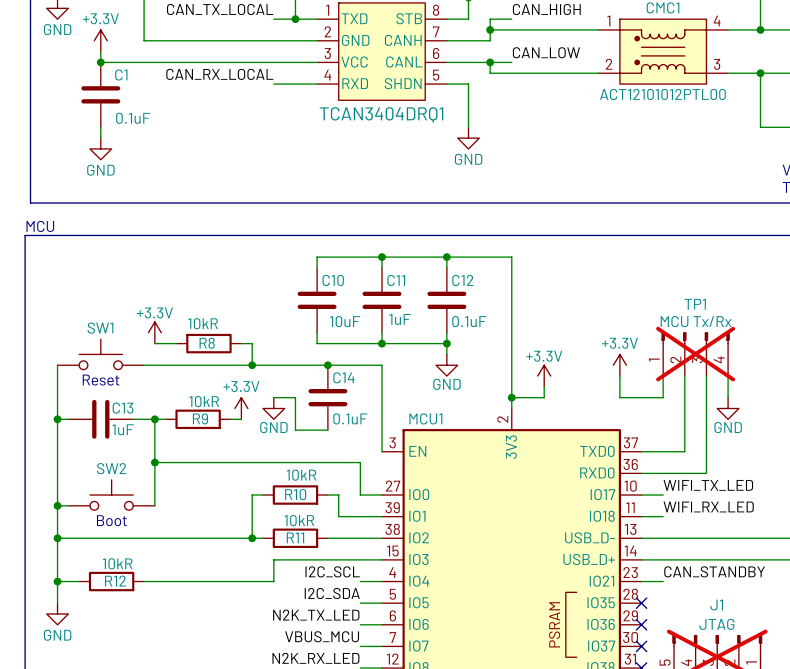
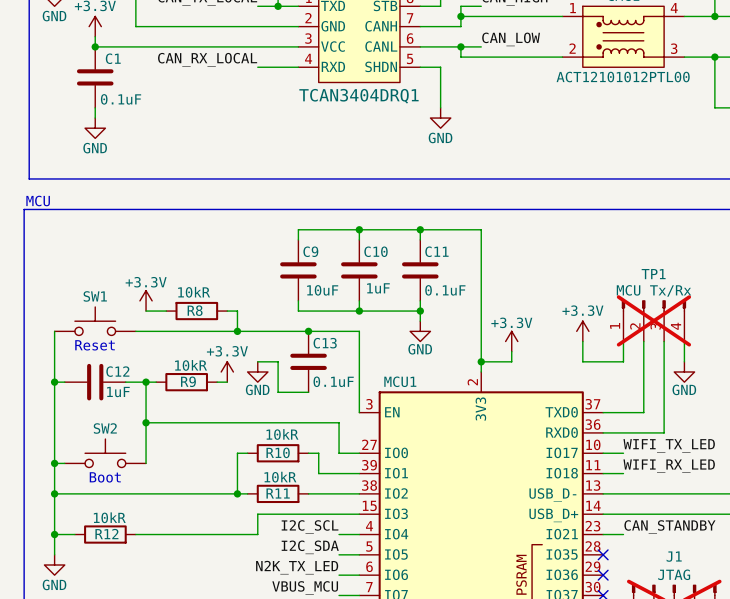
C10 name: C10 (333, 280) -> C9 (310, 251)
C11 name: C11 (396, 280) -> C10 (376, 251)
C12 name: C12 (462, 280) -> C11 (436, 251)
C14 name: C14 (343, 377) -> C13 (325, 343)
C13 name: C13 (123, 408) -> C12 (117, 371)

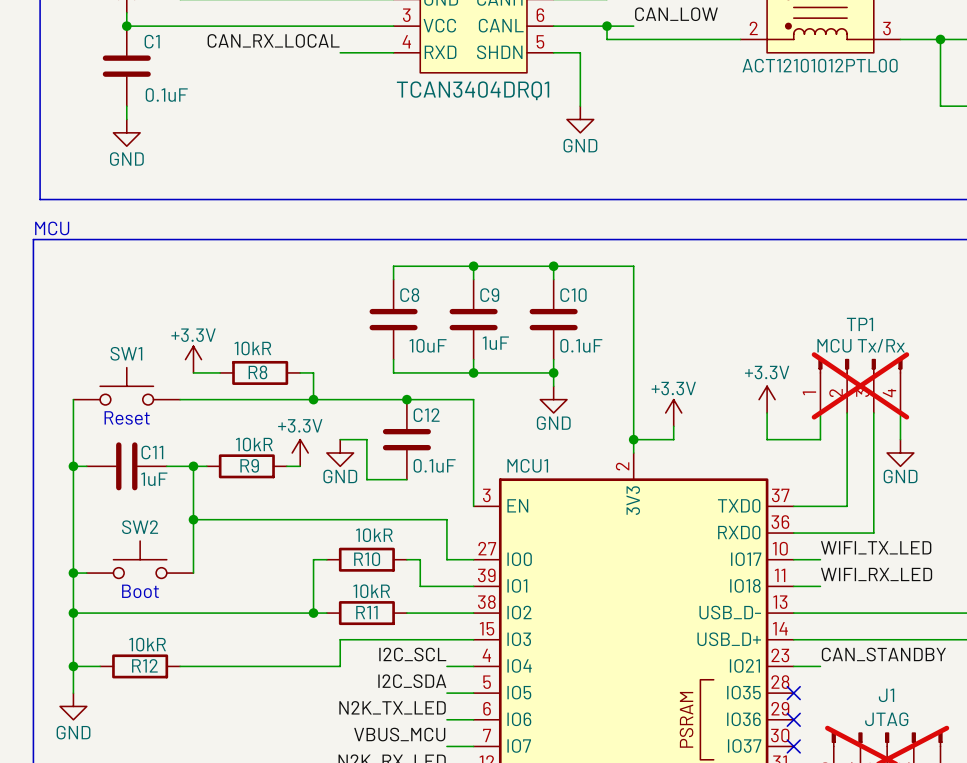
C9 name: C9 (310, 251) -> C8 (409, 295)
C10 name: C10 (376, 251) -> C9 (489, 295)
C11 name: C11 (436, 251) -> C10 (573, 295)
C13 name: C13 (325, 343) -> C12 (426, 415)
C12 name: C12 (117, 371) -> C11 (152, 452)

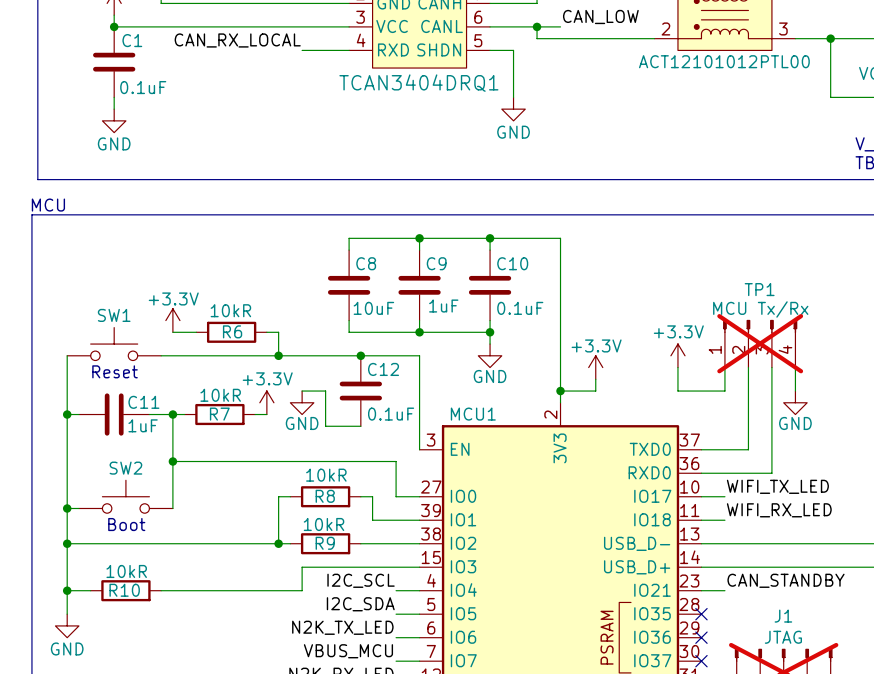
R8 name: R8 (257, 372) -> R6 (232, 331)
R9 name: R9 (249, 465) -> R7 (219, 414)
R10 name: R10 (367, 559) -> R8 (325, 496)
R11 name: R11 (366, 612) -> R9 (325, 543)
R12 name: R12 (144, 665) -> R10 (124, 590)

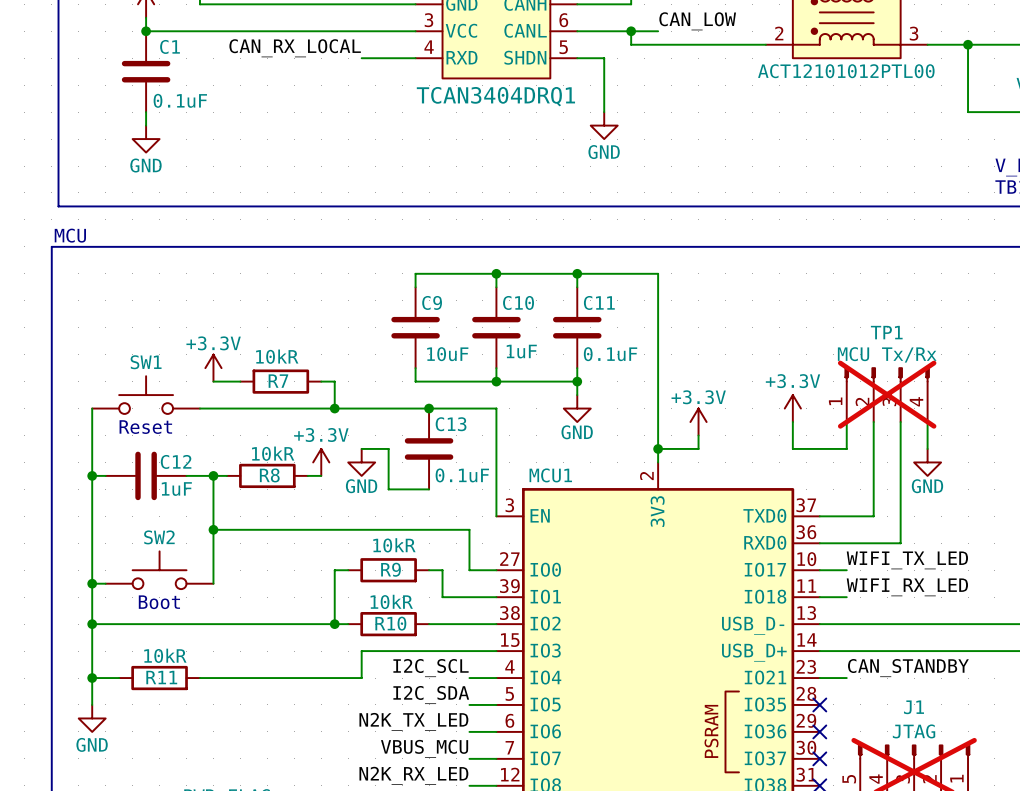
C8 name: C8 (366, 263) -> C9 (432, 302)
C9 name: C9 (436, 263) -> C10 (518, 302)
C10 name: C10 (512, 263) -> C11 (599, 302)
R6 name: R6 (232, 331) -> R7 (278, 381)
C12 name: C12 (383, 369) -> C13 (451, 424)
C11 name: C11 (143, 402) -> C12 (176, 461)
R7 name: R7 (219, 414) -> R8 (269, 475)
R8 name: R8 (325, 496) -> R9 (390, 569)
R9 name: R9 (325, 543) -> R10 (390, 623)
R10 name: R10 (124, 590) -> R11 (161, 677)

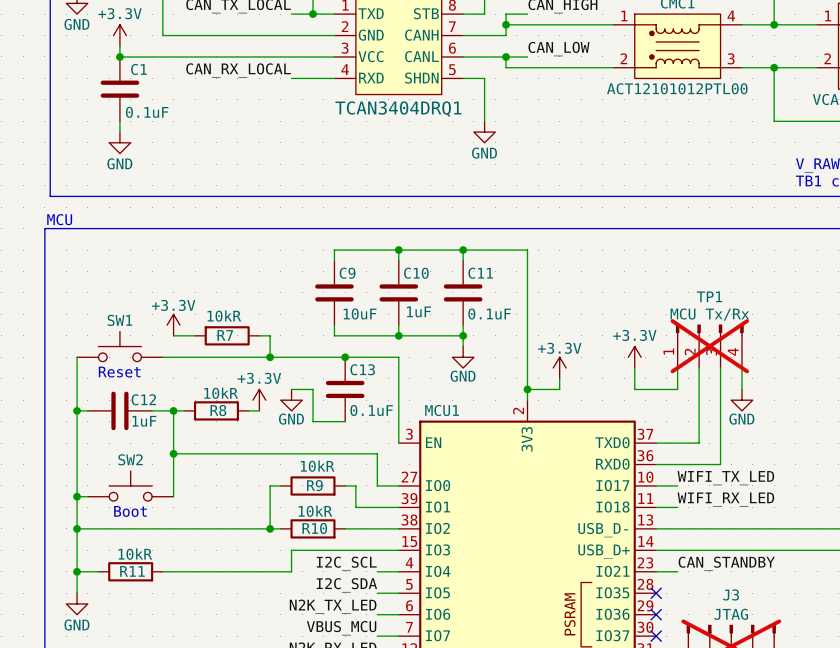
J1 name: J1 (913, 707) -> J3 (731, 594)

